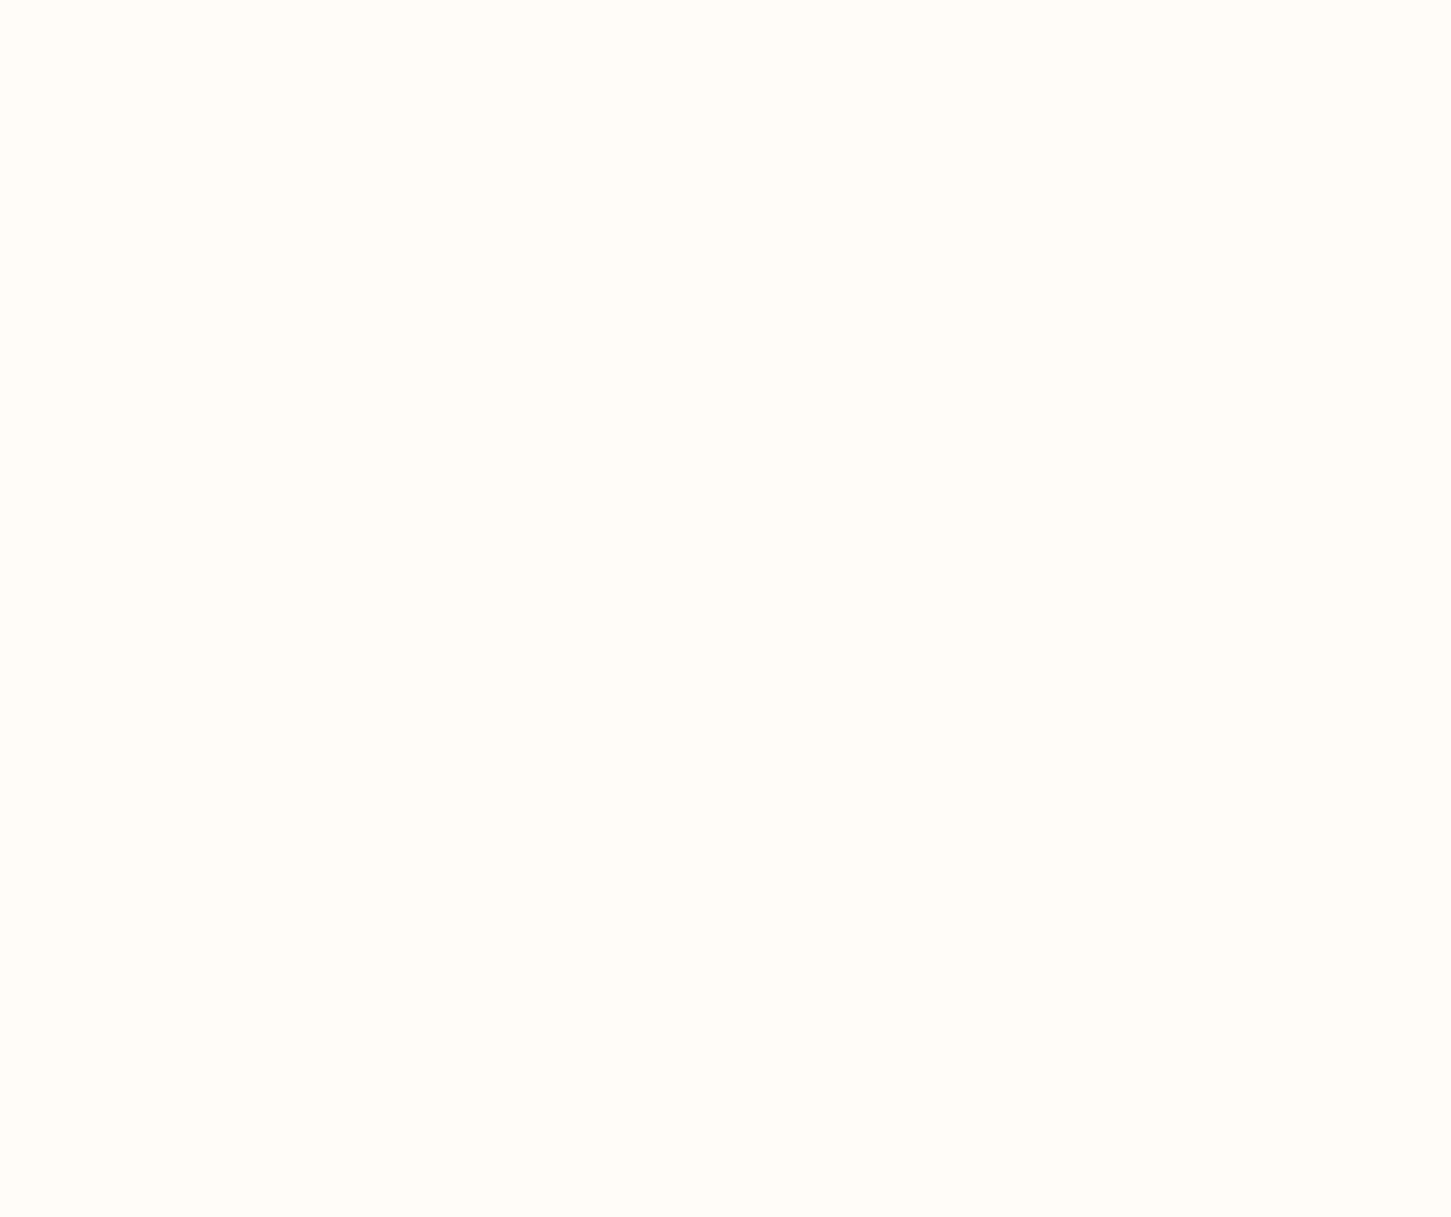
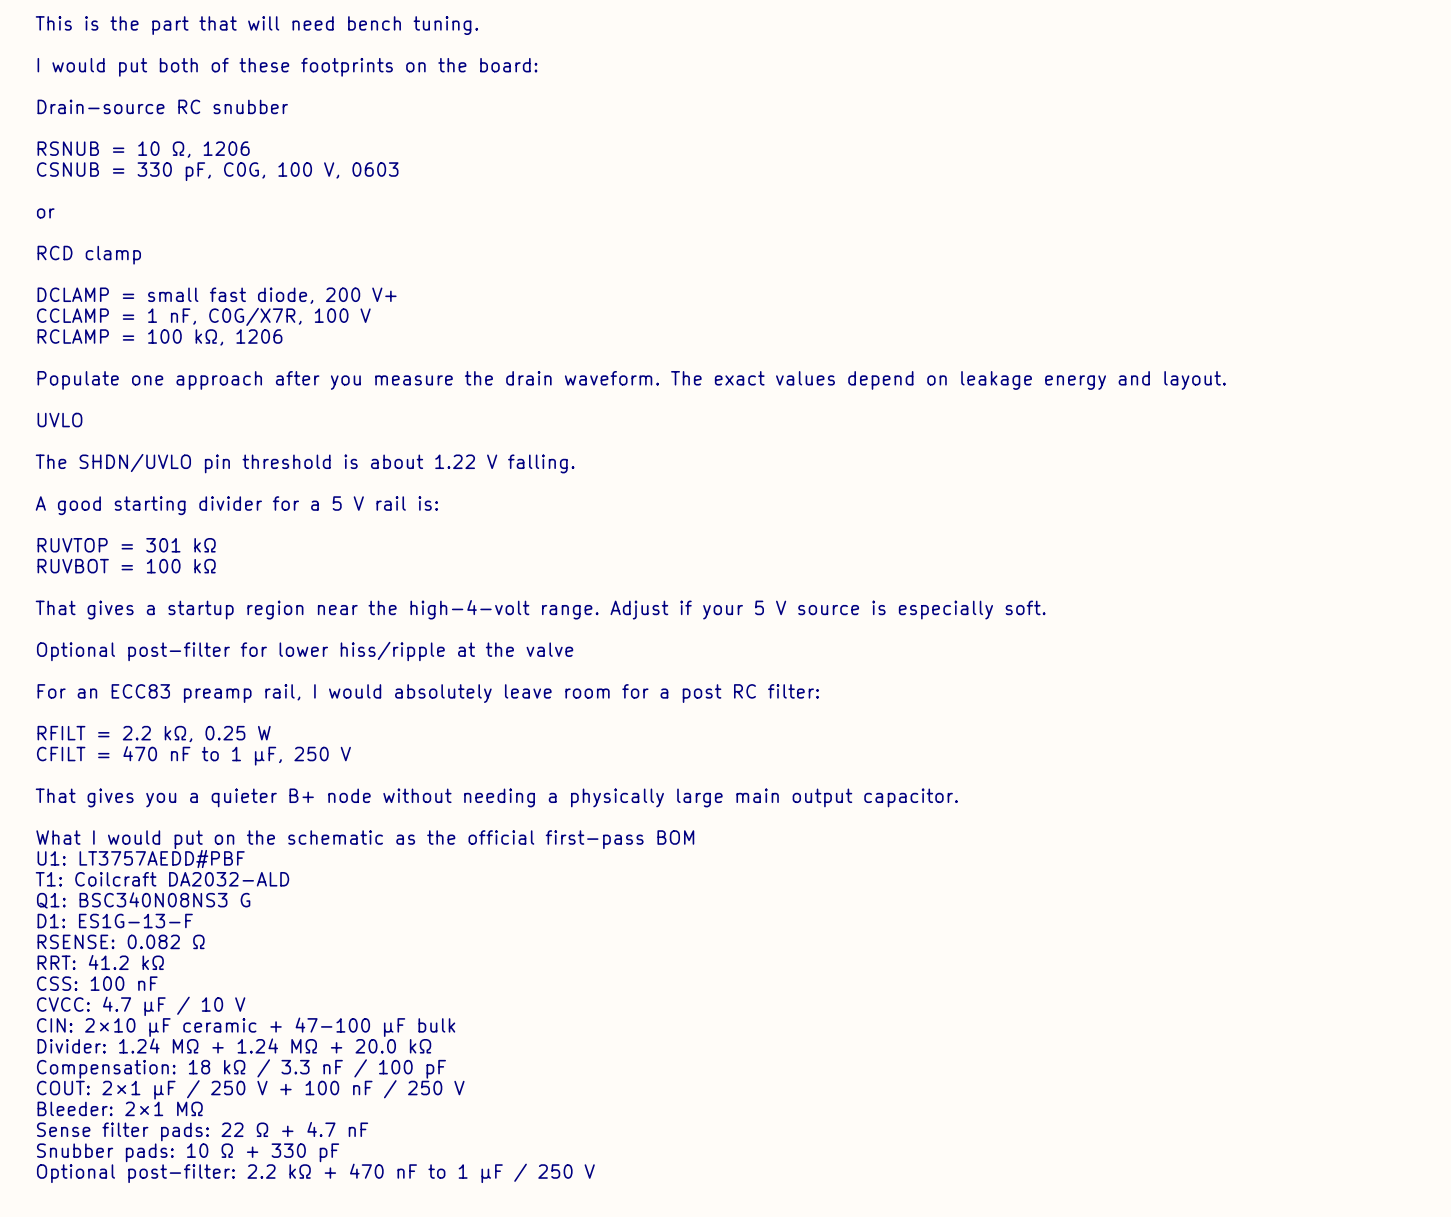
text: none -> This is the part that will need bench tuning. (256, 25)
text: none -> I would put both of these footprints on the board: (287, 67)
text: none -> Drain-source RC snubber (162, 106)
text: none -> RSNUB = 10 Ω, 1206 (143, 149)
text: none -> CSNUB = 330 pF, C0G, 100 V, 0603 (217, 171)
text: none -> or (45, 213)
text: none -> RCD clamp (89, 255)
text: none -> DCLAMP = small fast diode, 200 V+ (217, 295)
text: none -> CCLAMP = 1 nF, C0G/X7R, 100 V (203, 316)
text: none -> RCLAMP = 100 kΩ, 1206 (159, 337)
text: none -> Populate one approach after you measure the drain waveform. The exact values depend on leakage energy and layout. (631, 380)
text: none -> UVLO (59, 420)
text: none -> The SHDN/UVLO pin threshold is about 1.22 V falling. (305, 463)
text: none -> A good starting divider for a 5 V rail is: (236, 505)
text: none -> RUVTOP = 301 kΩ (126, 545)
text: none -> RUVBOT = 100 kΩ (126, 566)
text: none -> That gives a startup region near the high-4-volt range. Adjust if your 5 V source is especially soft. (540, 609)
text: none -> Optional post-filter for lower hiss/ripple at the valve (305, 651)
text: none -> For an ECC83 preamp rail, I would absolutely leave room for a post RC filter: (428, 693)
text: none -> RFILT = 2.2 kΩ, 0.25 W (154, 734)
text: none -> CFILT = 470 nF to 1 µF, 250 V (193, 755)
text: none -> That gives you a quieter B+ node without needing a physically large main output capacitor. (496, 797)
text: none -> What I would put on the schematic as the official first-pass BOM (365, 839)
text: none -> U1: LT3757AEDD#PBF (141, 859)
text: none -> T1: Coilcraft DA2032-ALD (162, 879)
text: none -> Q1: BSC340N08NS3 G (143, 900)
text: none -> D1: ES1G-13-F (115, 921)
text: none -> RSENSE: 0.082 Ω (121, 941)
text: none -> RRT: 41.2 kΩ (100, 962)
text: none -> CSS: 100 nF (97, 983)
text: none -> CVCC: 4.7 µF / 10 V (141, 1006)
text: none -> CIN: 2×10 µF ceramic + 47-100 µF bulk (246, 1027)
text: none -> Divider: 1.24 MΩ + 1.24 MΩ + 20.0 kΩ (234, 1045)
text: none -> Compensation: 18 kΩ / 3.3 nF / 100 pF (241, 1069)
text: none -> COUT: 2×1 µF / 250 V + 100 nF / 250 V (250, 1089)
text: none -> Bleeder: 2×1 MΩ (120, 1108)
text: none -> Sense filter pads: 22 Ω + 4.7 nF (202, 1131)
text: none -> Snubber pads: 10 Ω + 330 pF (188, 1152)
text: none -> Optional post-filter: 2.2 kΩ + 470 nF to 1 µF / 250 V (315, 1173)

